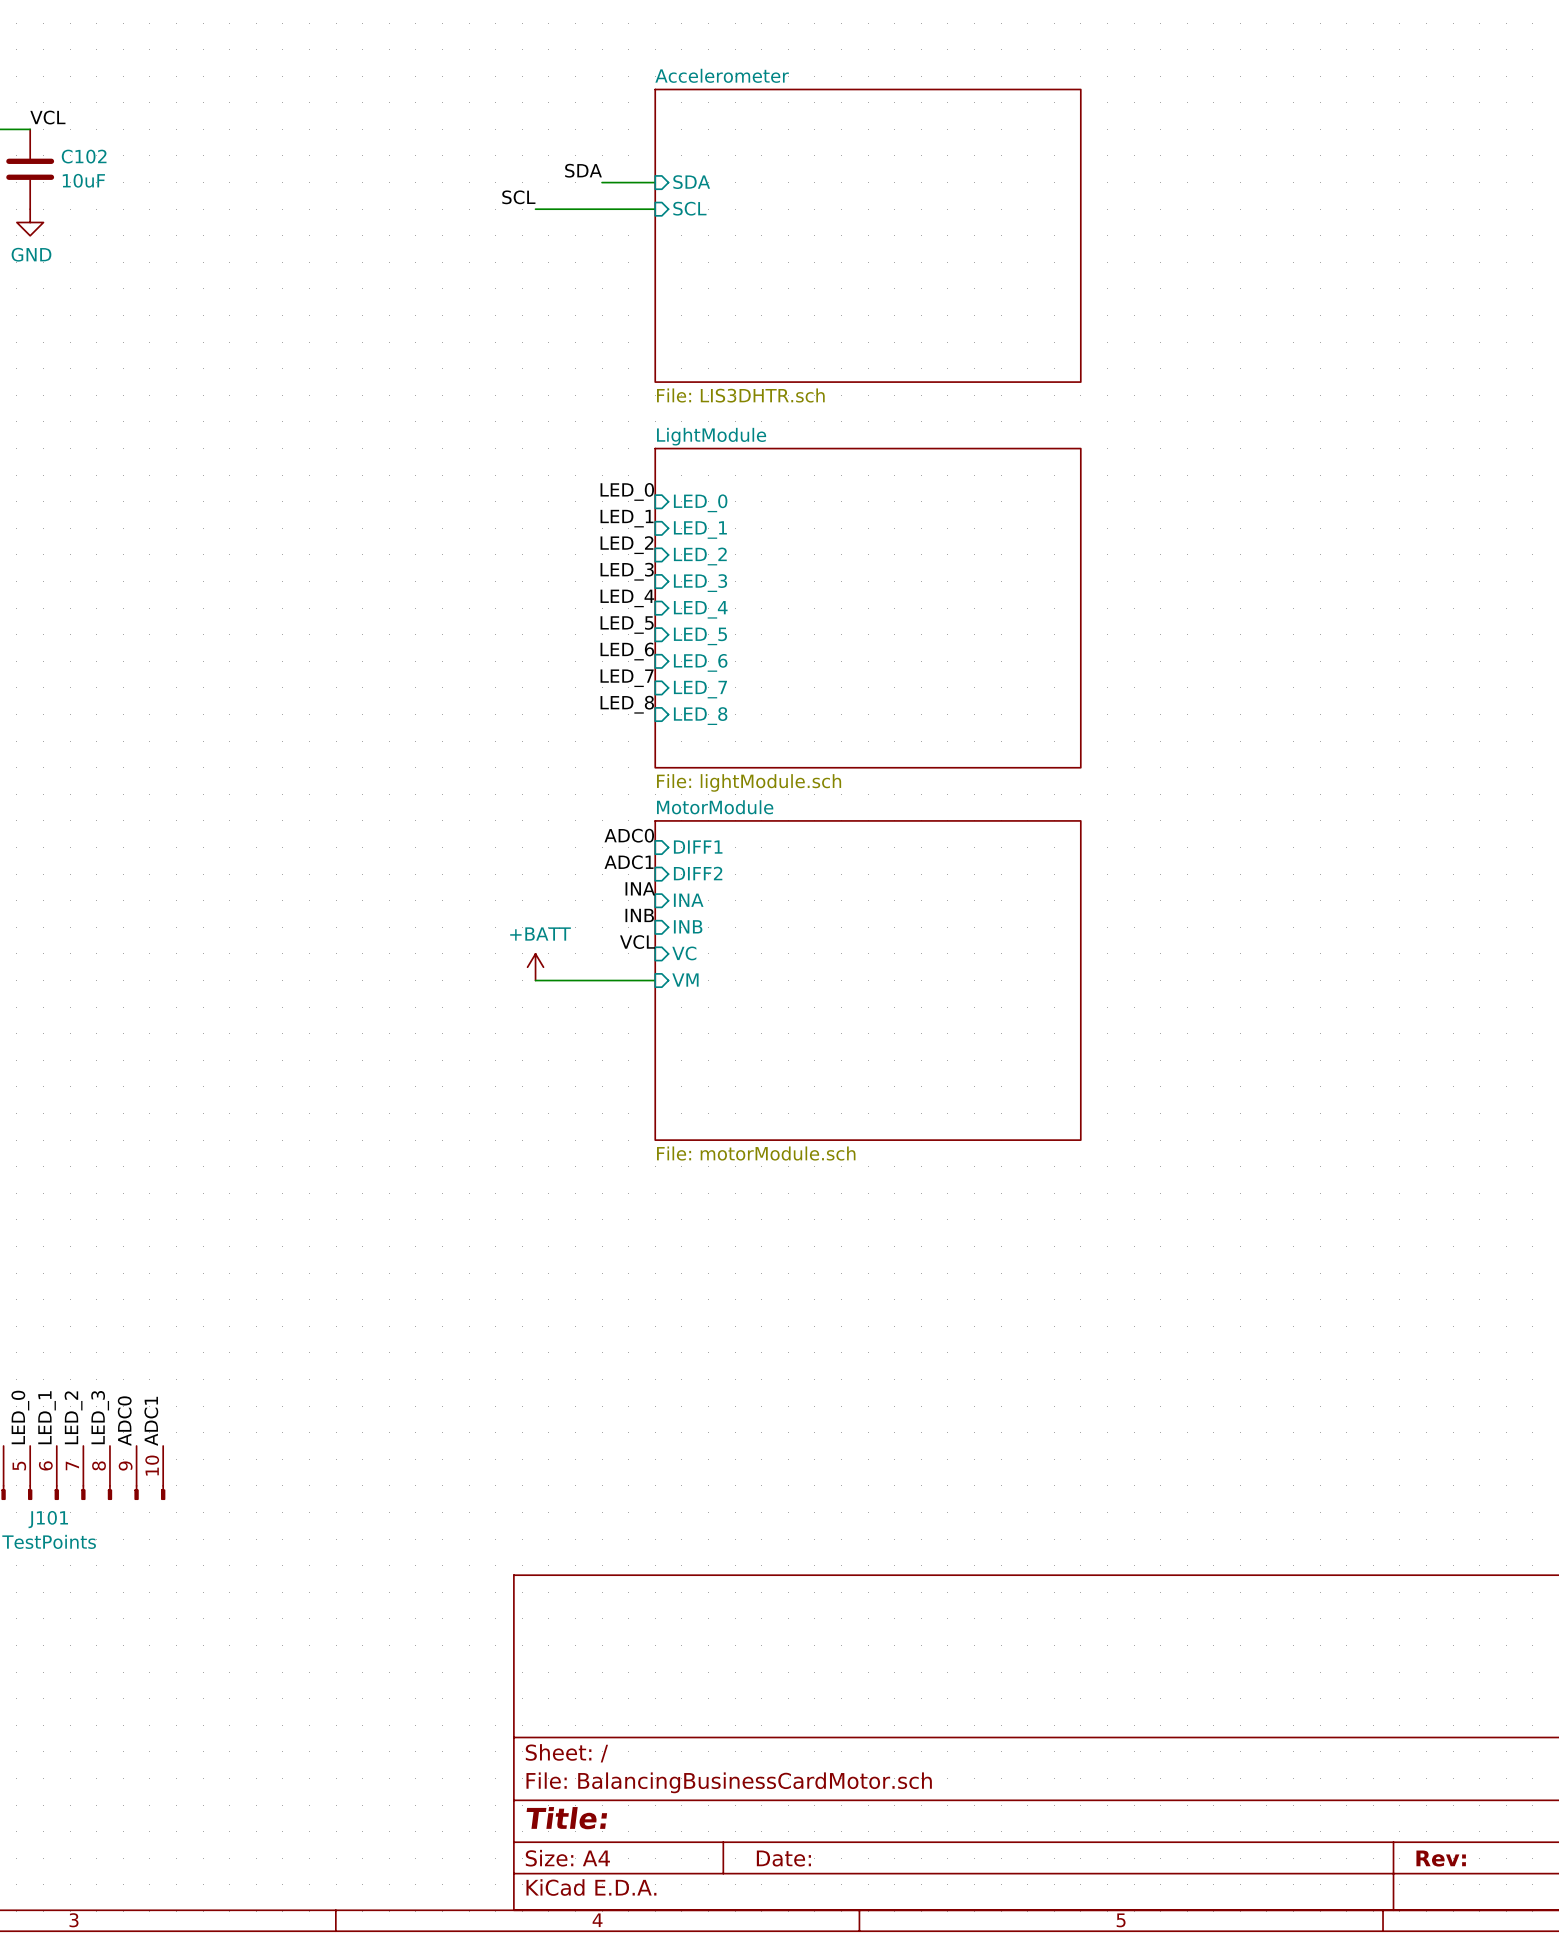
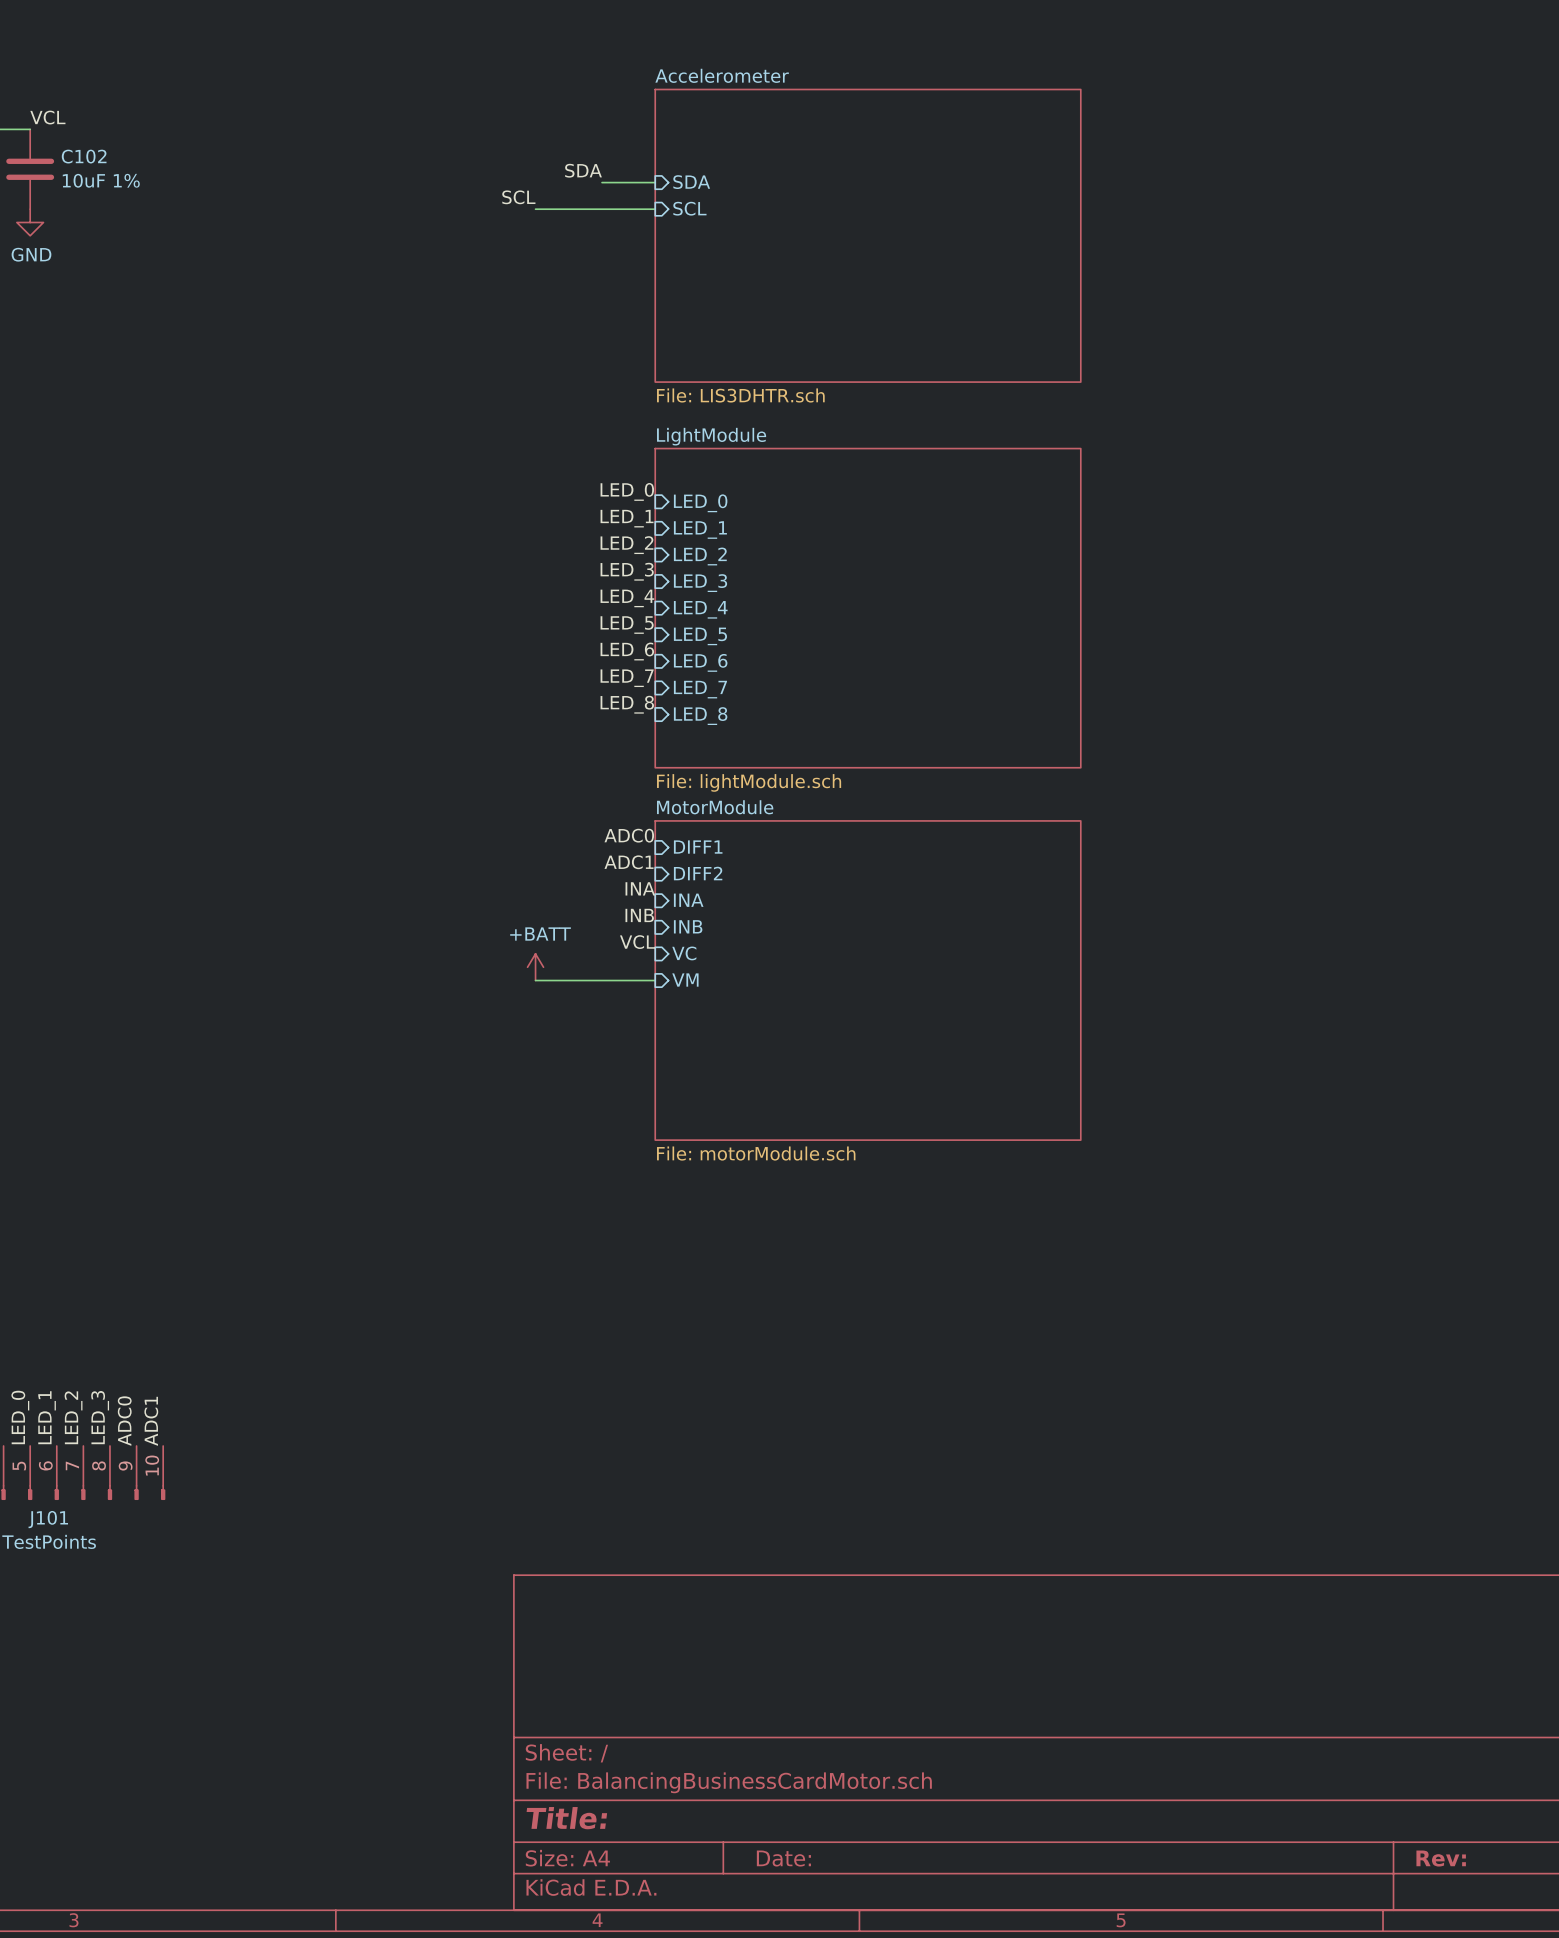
C102 value: 10uF (83, 180) -> 10uF 1% (101, 180)

